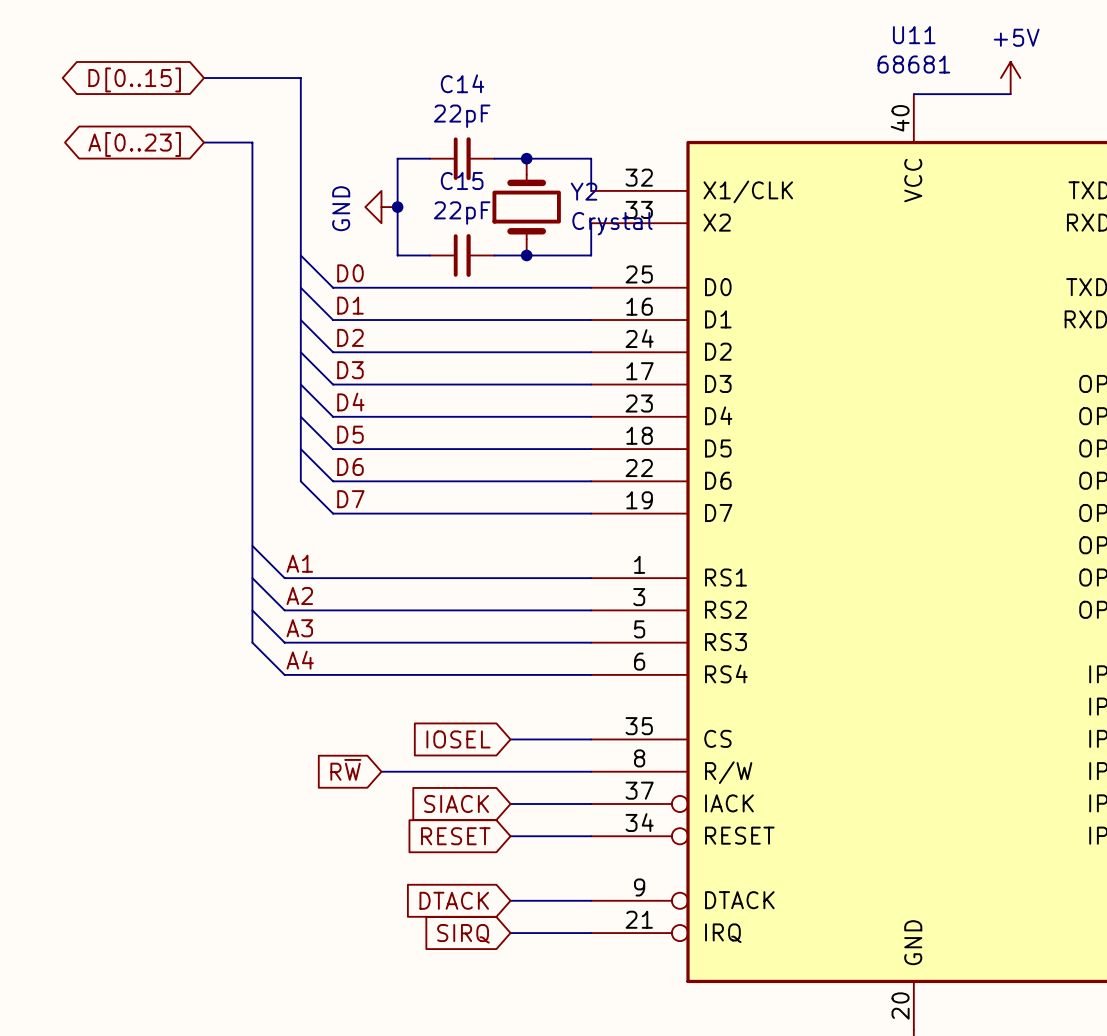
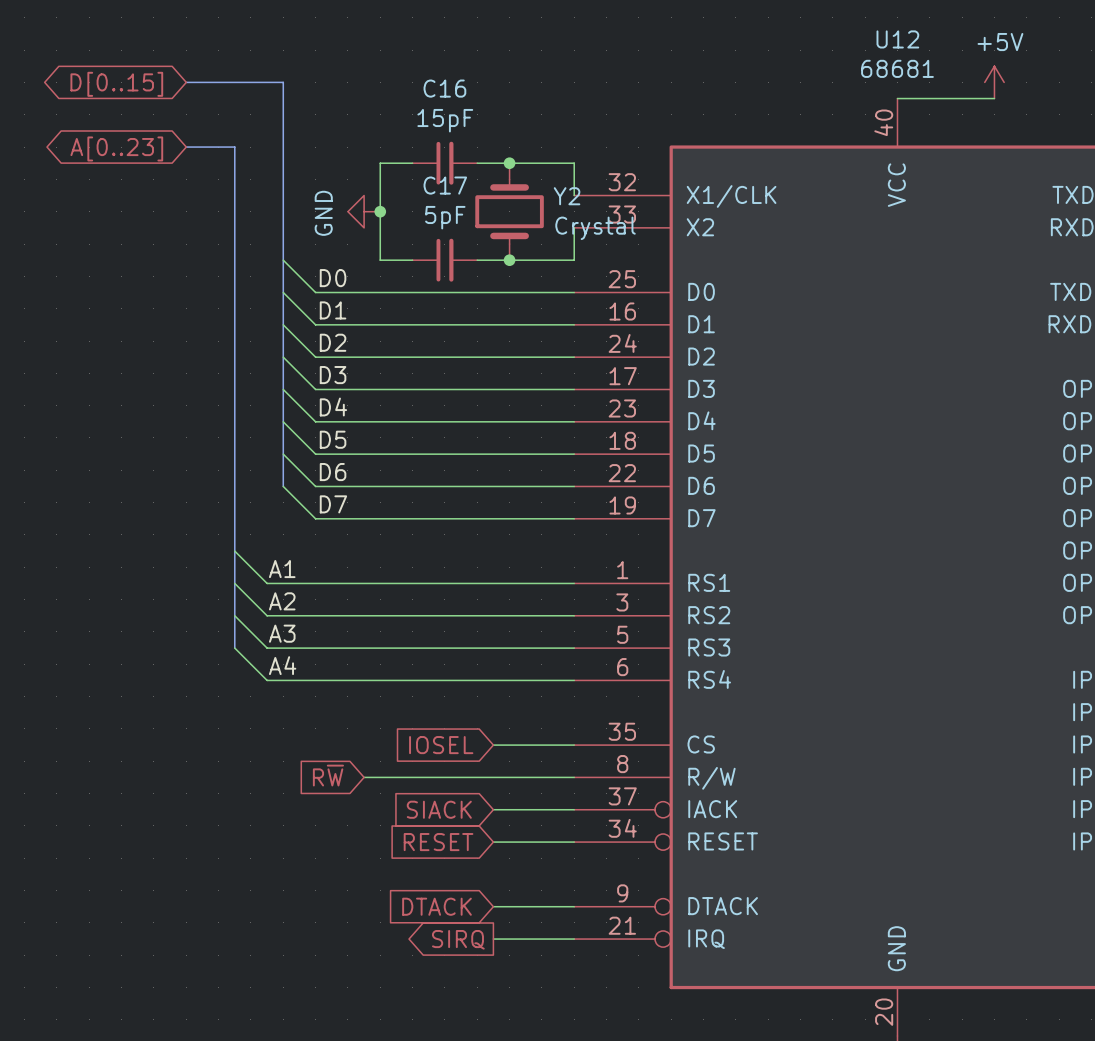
U11 name: U11 (914, 35) -> U12 (897, 39)
C14 name: C14 (462, 83) -> C16 (444, 88)
C14 value: 22pF (462, 116) -> 15pF (445, 120)
C15 name: C15 (462, 180) -> C17 (445, 185)
C15 value: 22pF (462, 213) -> 5pF (445, 217)
global label shape: input (463, 933) -> output (458, 939)

